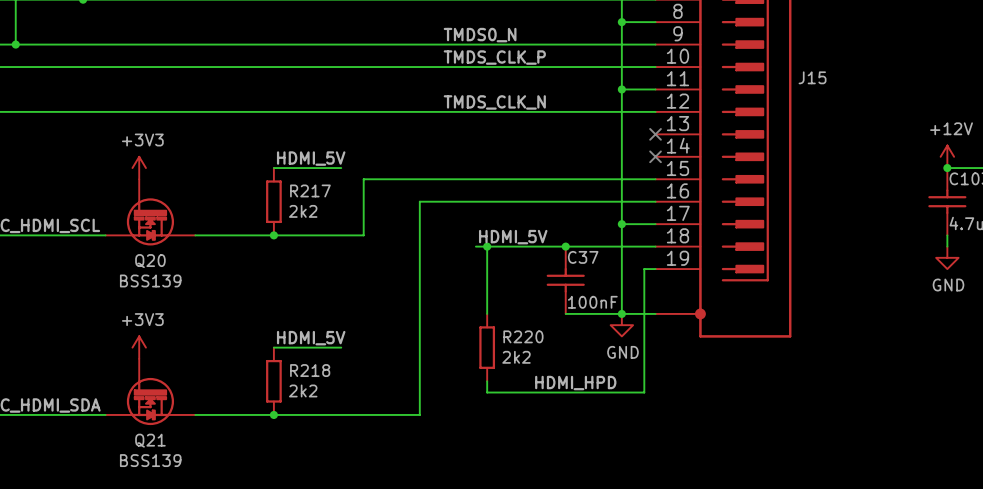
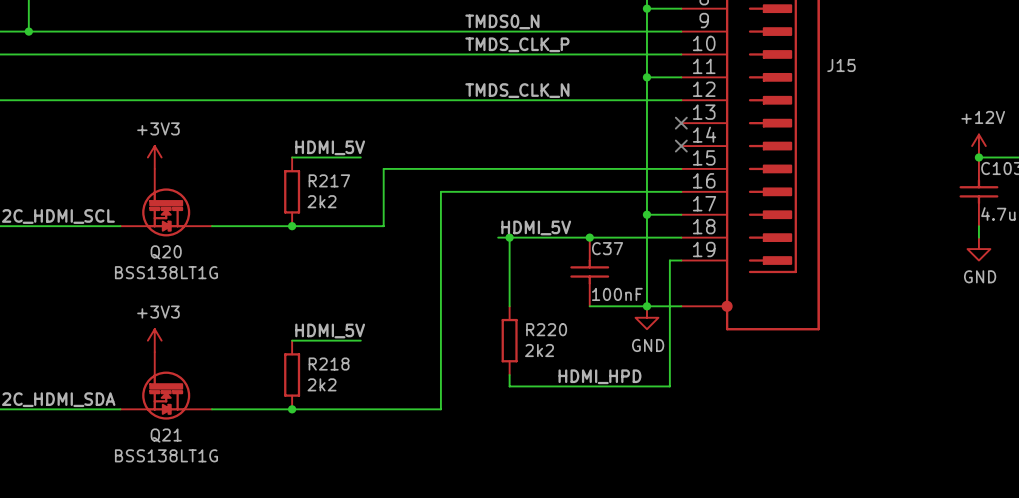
Q20 value: BSS139 (150, 280) -> BSS138LT1G (166, 272)
Q21 value: BSS139 (150, 460) -> BSS138LT1G (166, 455)

